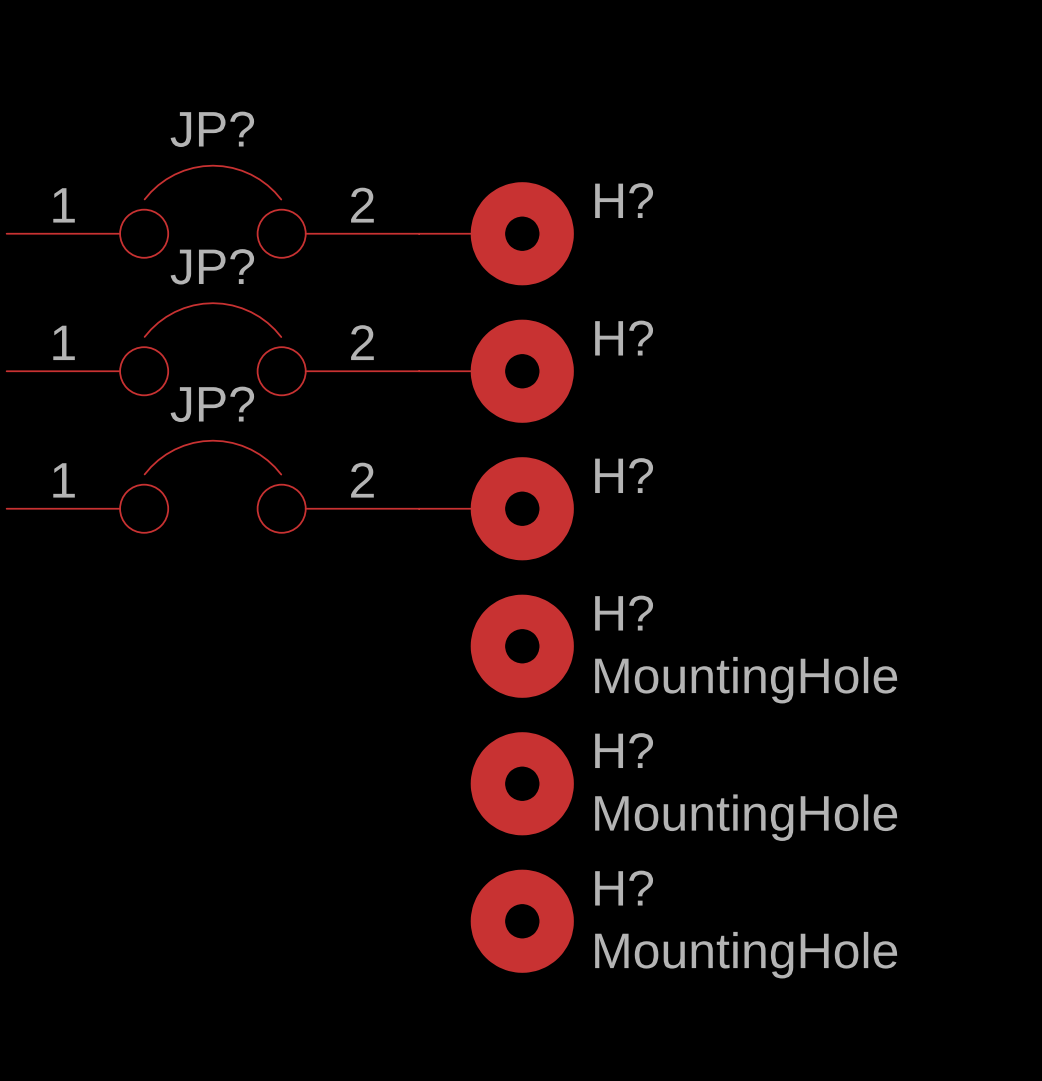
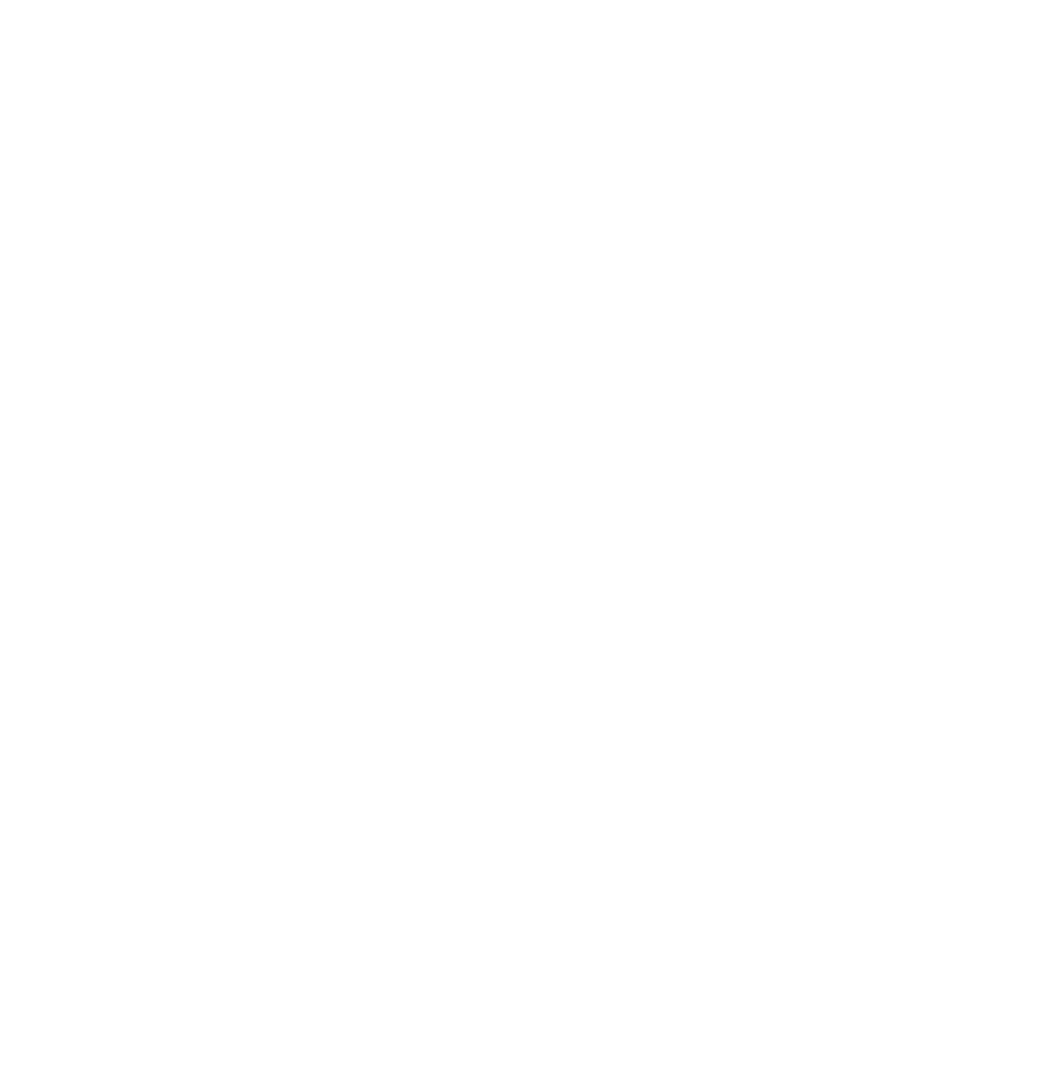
JP?: (212, 211) -> none
H?: (496, 233) -> none
JP?: (212, 349) -> none
H?: (496, 371) -> none
JP?: (212, 486) -> none
H?: (496, 508) -> none
H?: MountingHole (522, 646) -> none
H?: MountingHole (522, 783) -> none
H?: MountingHole (522, 921) -> none

